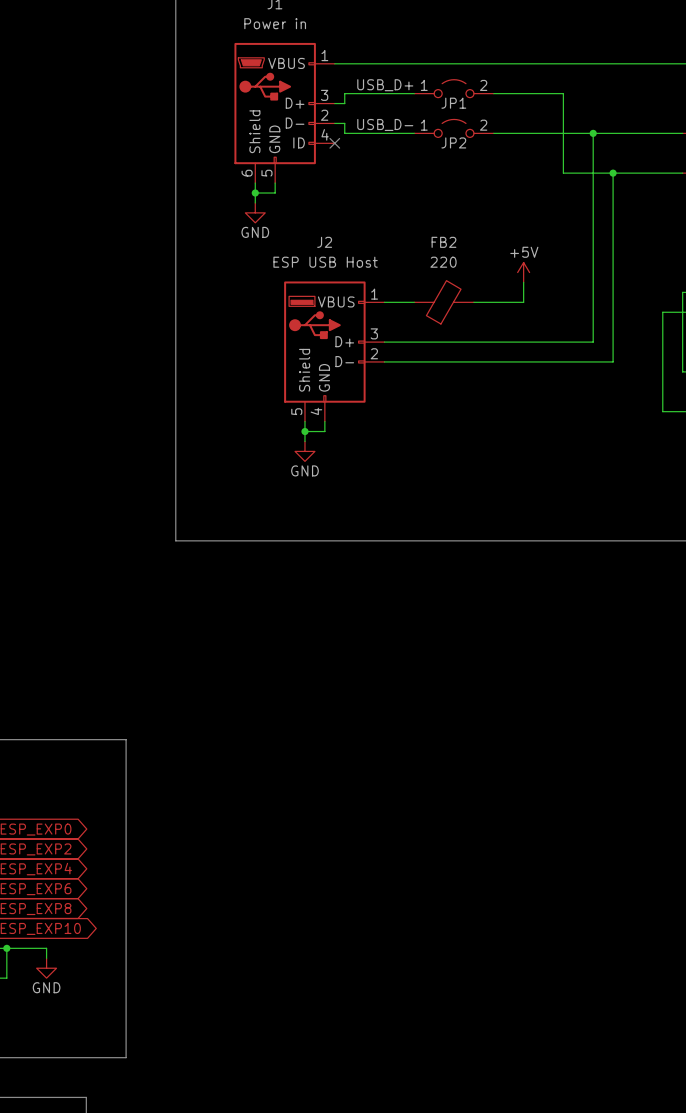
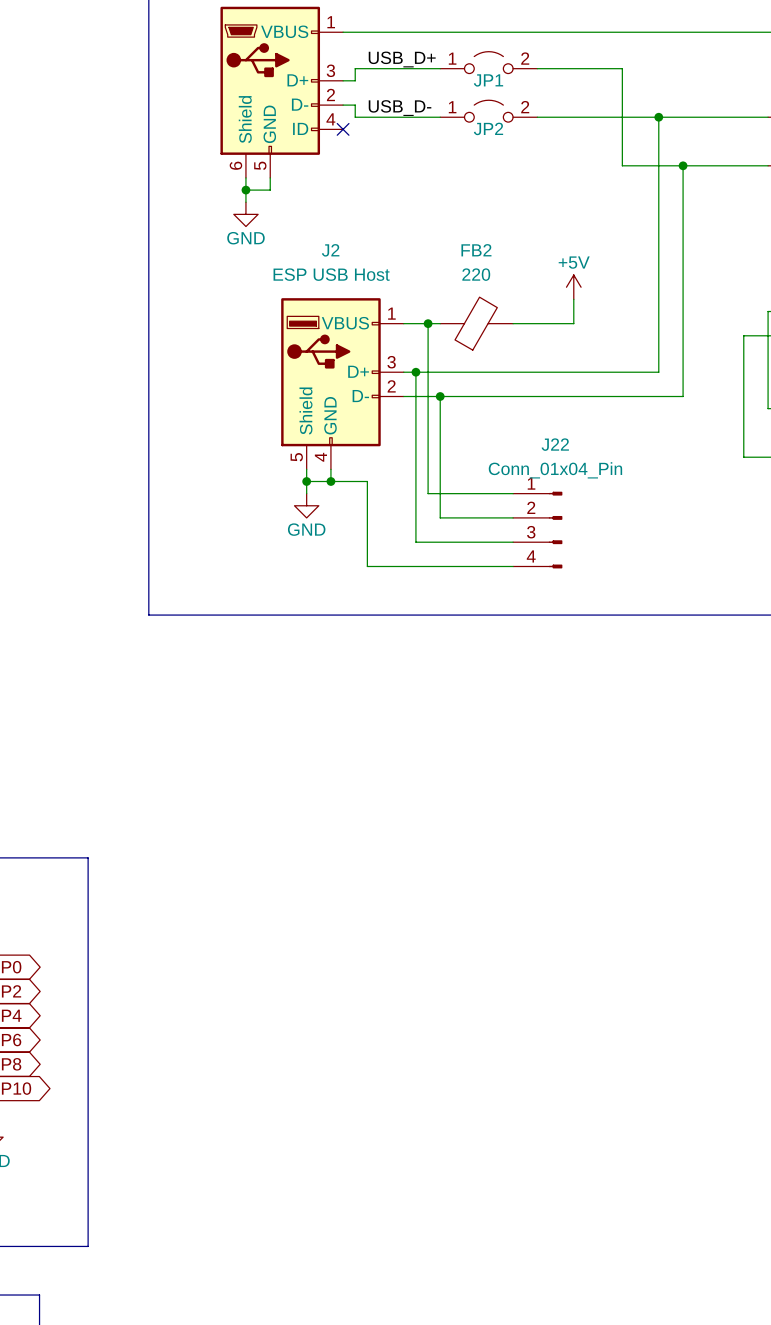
wire: none -> (428, 323) (428, 493) (513, 493)
junction: none -> (428, 323)
wire: none -> (415, 372) (415, 542) (513, 542)
junction: none -> (415, 372)
wire: none -> (440, 396) (440, 517) (513, 517)
junction: none -> (440, 396)
wire: none -> (330, 481) (367, 481) (367, 566) (513, 566)
junction: none -> (330, 481)
J22: none -> Conn_01x04_Pin (537, 530)

